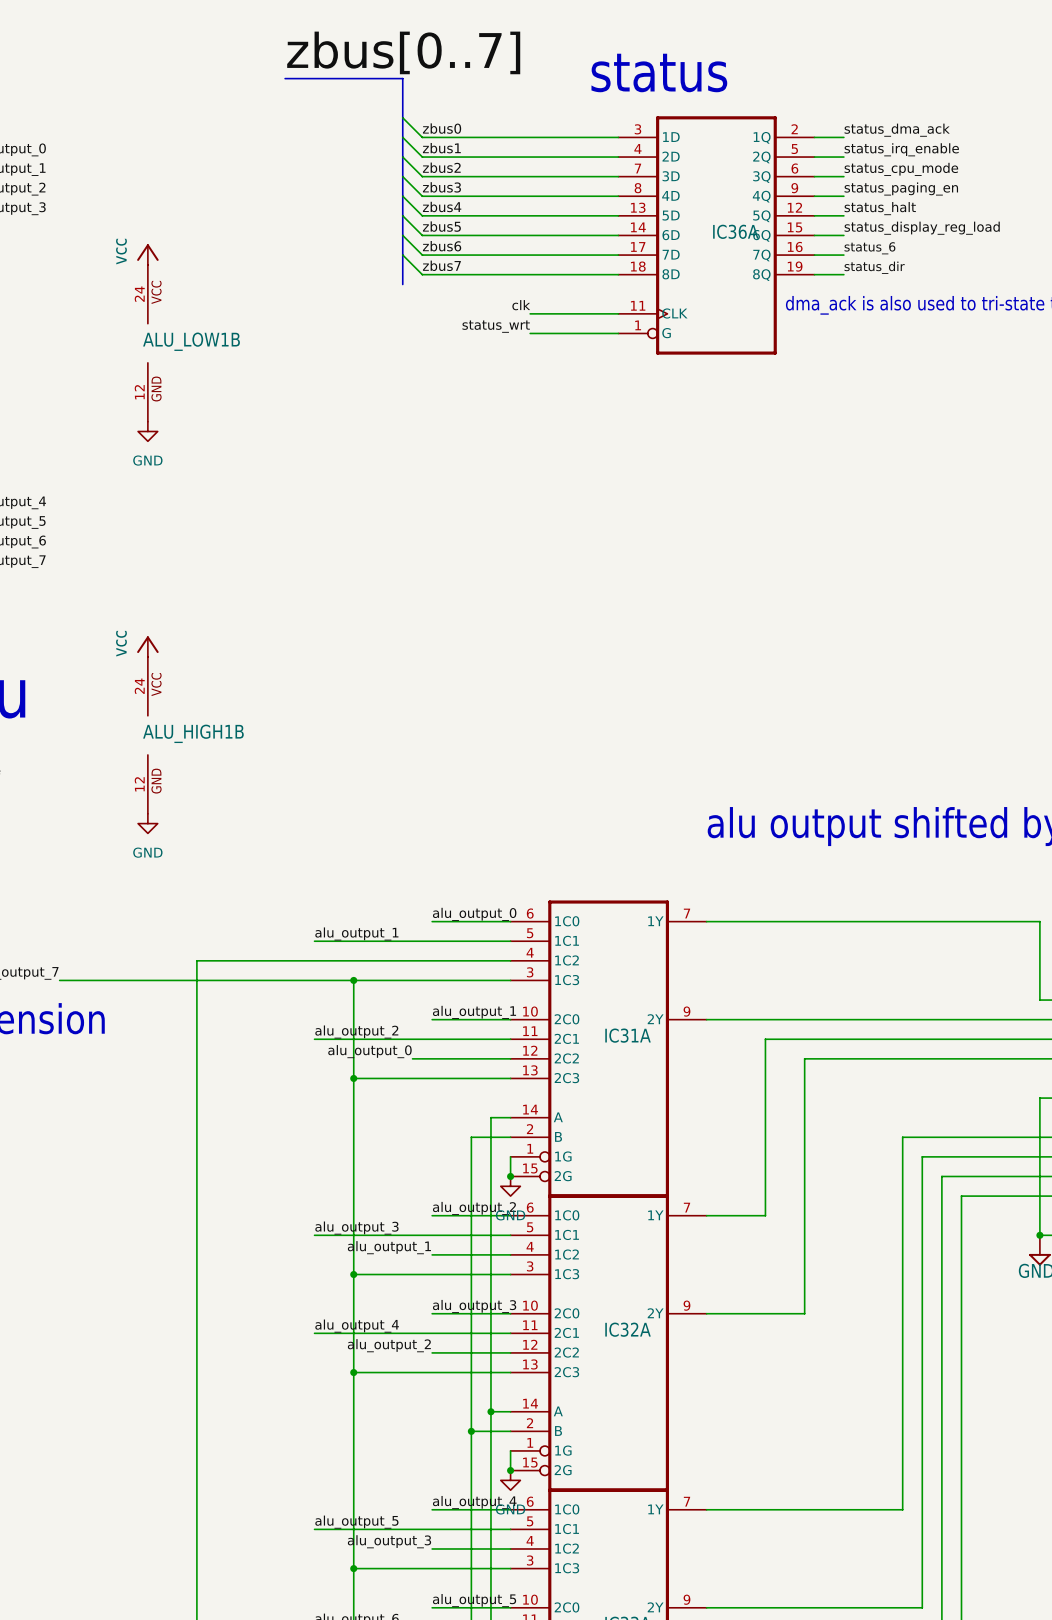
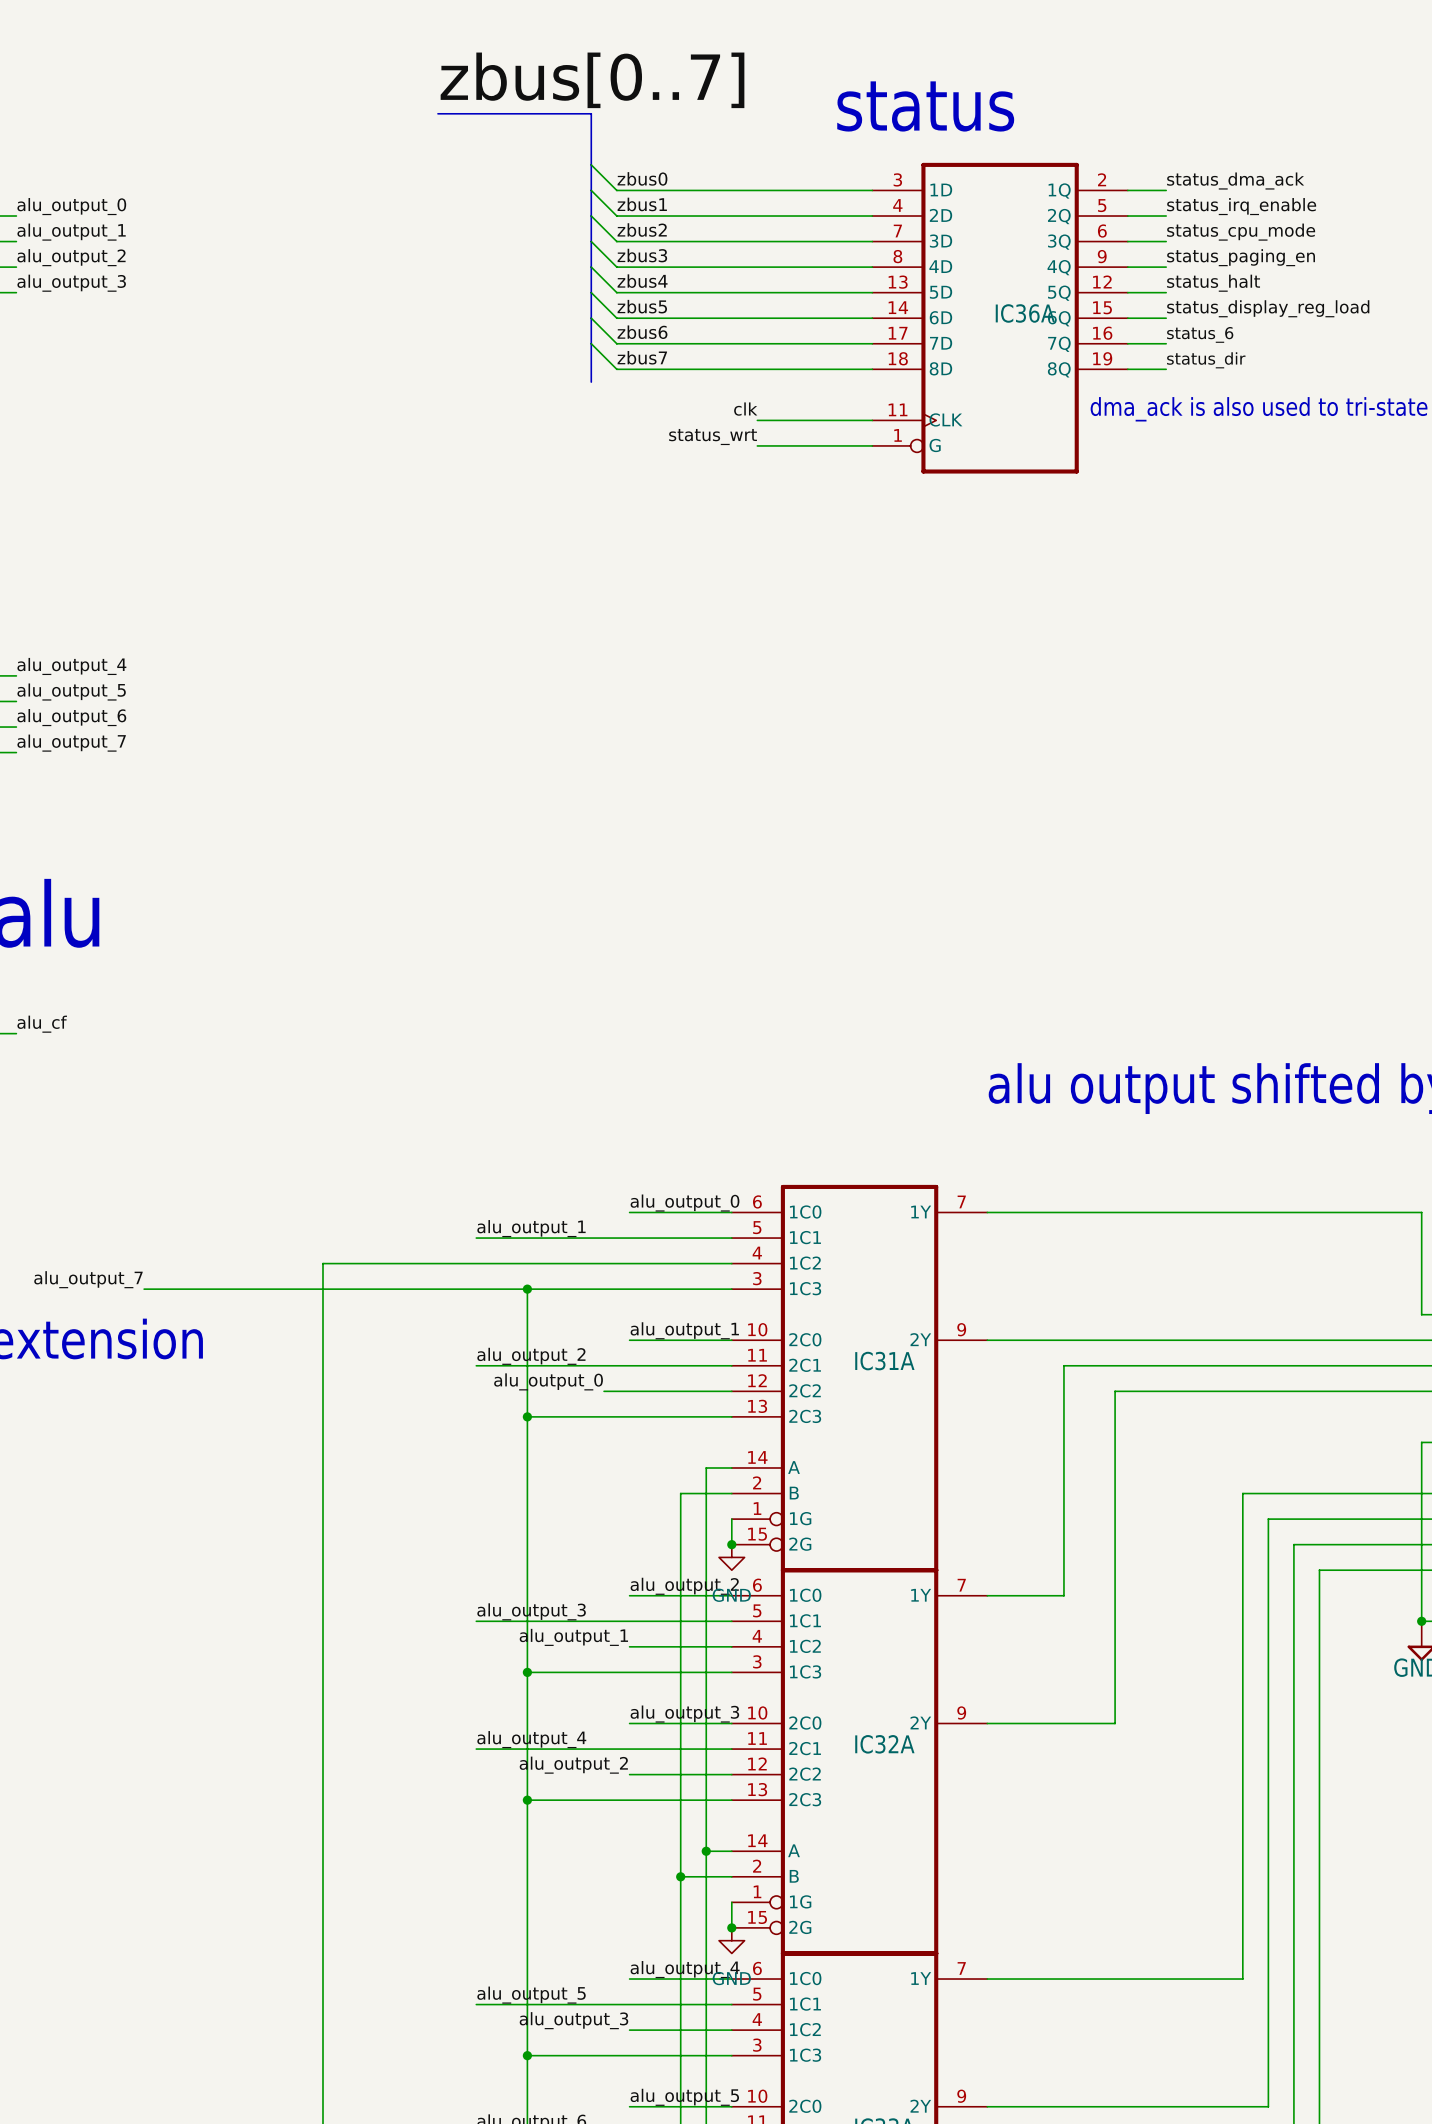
power symbol: vcc (147, 254) -> none
ALU_LOW1B: (147, 343) -> none
power symbol: GND (147, 431) -> none
power symbol: vcc (147, 646) -> none
ALU_HIGH1B: (147, 735) -> none
power symbol: GND (147, 823) -> none

